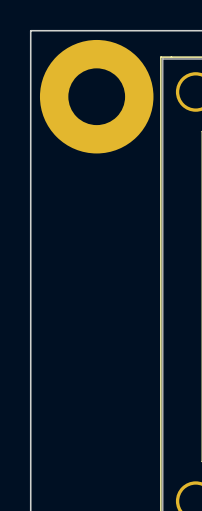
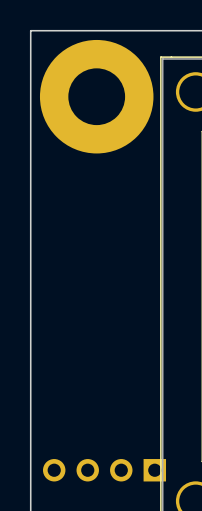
part: none -> (104, 470)

